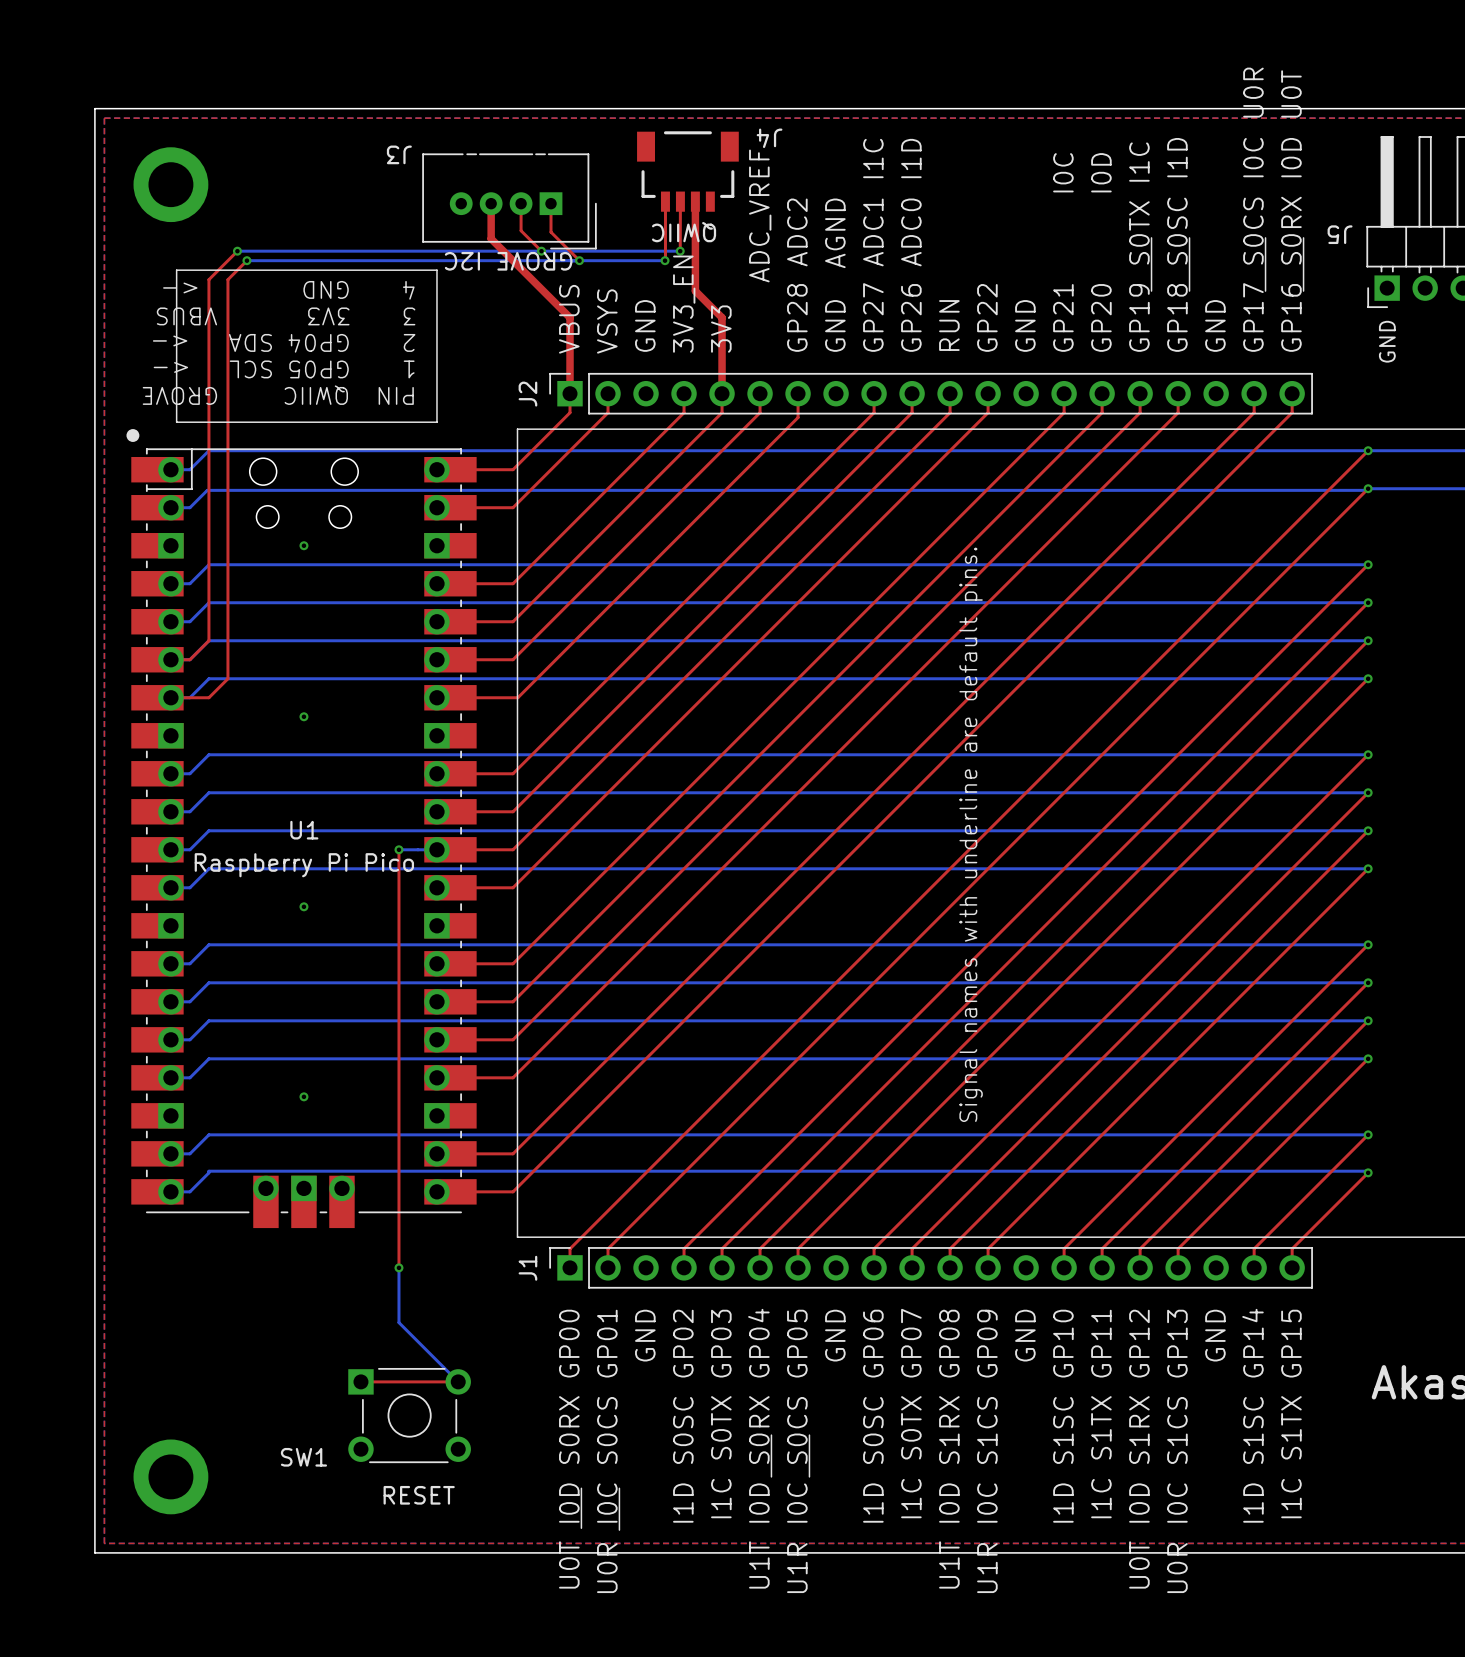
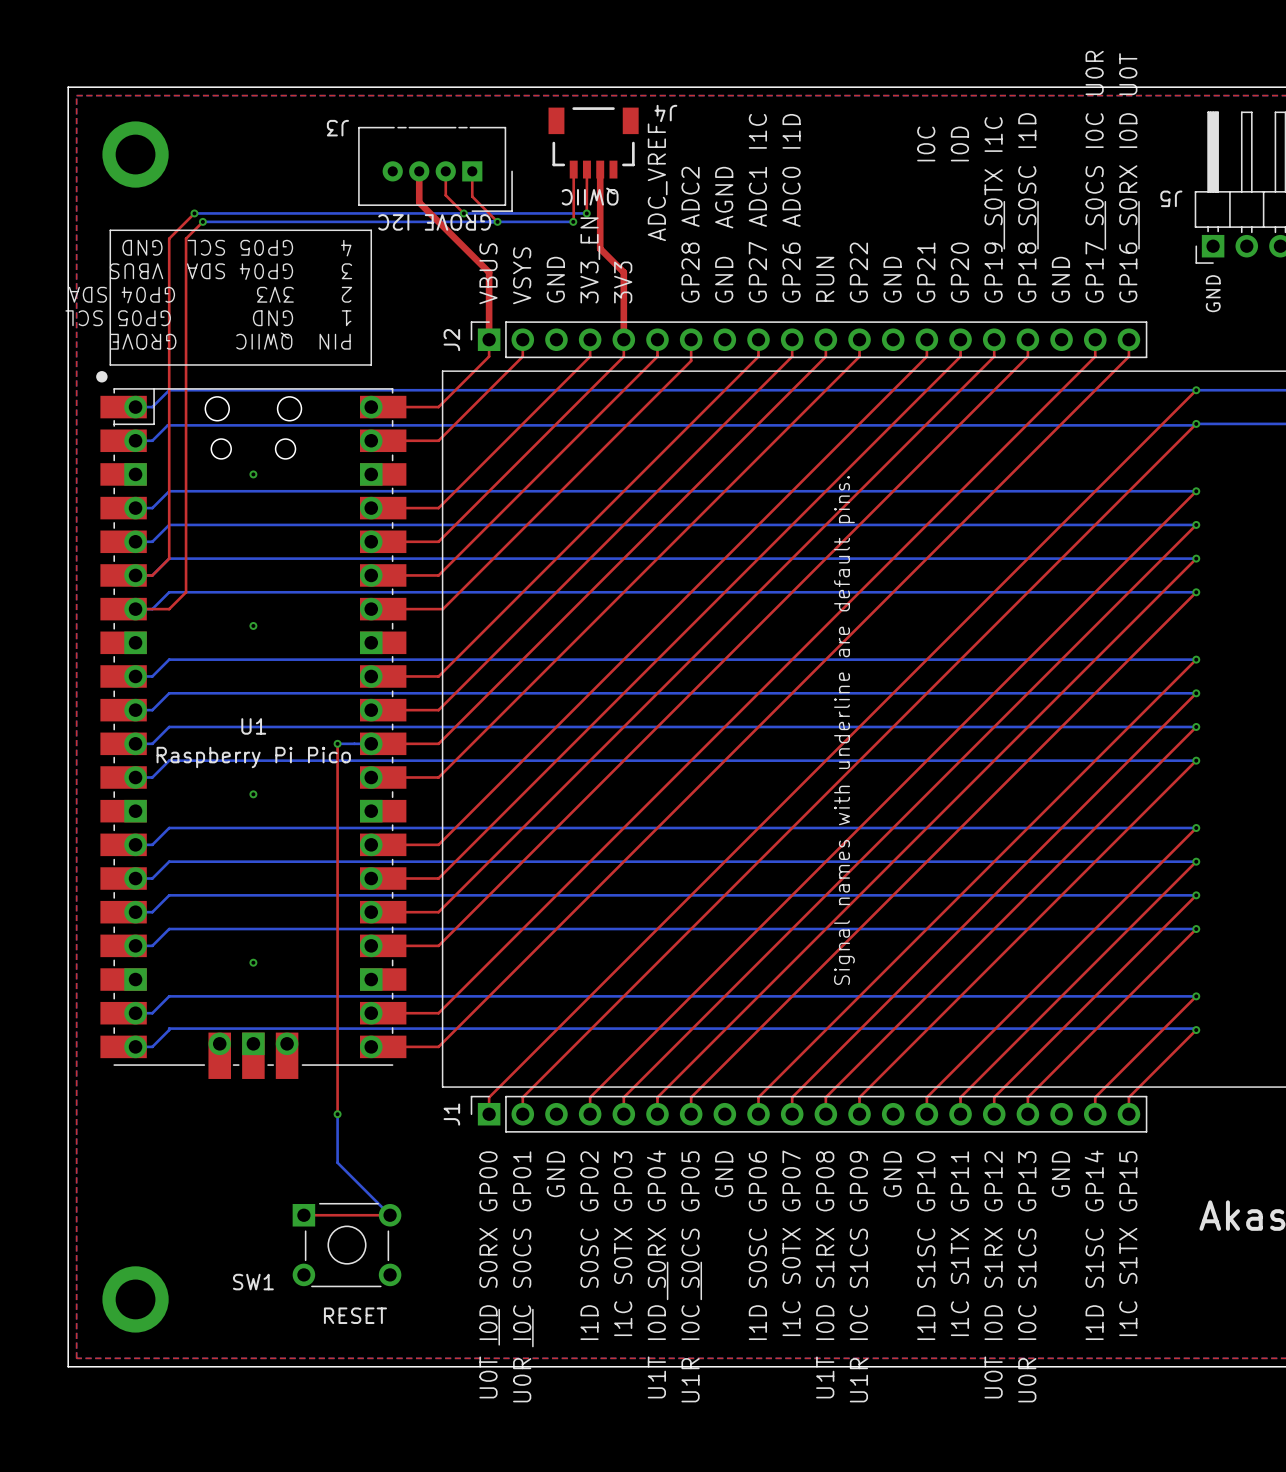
line: (176, 270) (176, 422) -> (140, 230) (110, 230) (110, 364) (140, 364)
text: 4 GND <- (288, 290) -> 4 GP05 SCL GND (236, 248)
text: 3 3V3 VBUS (286, 316) -> 3 GP04 SDA VBUS (230, 271)
text: 2 GP04 SDA <- (284, 343) -> 2 3V3 GP04 SDA (210, 295)
text: 1 GP05 SCL <- (284, 369) -> 1 GND GP05 SCL (208, 318)

